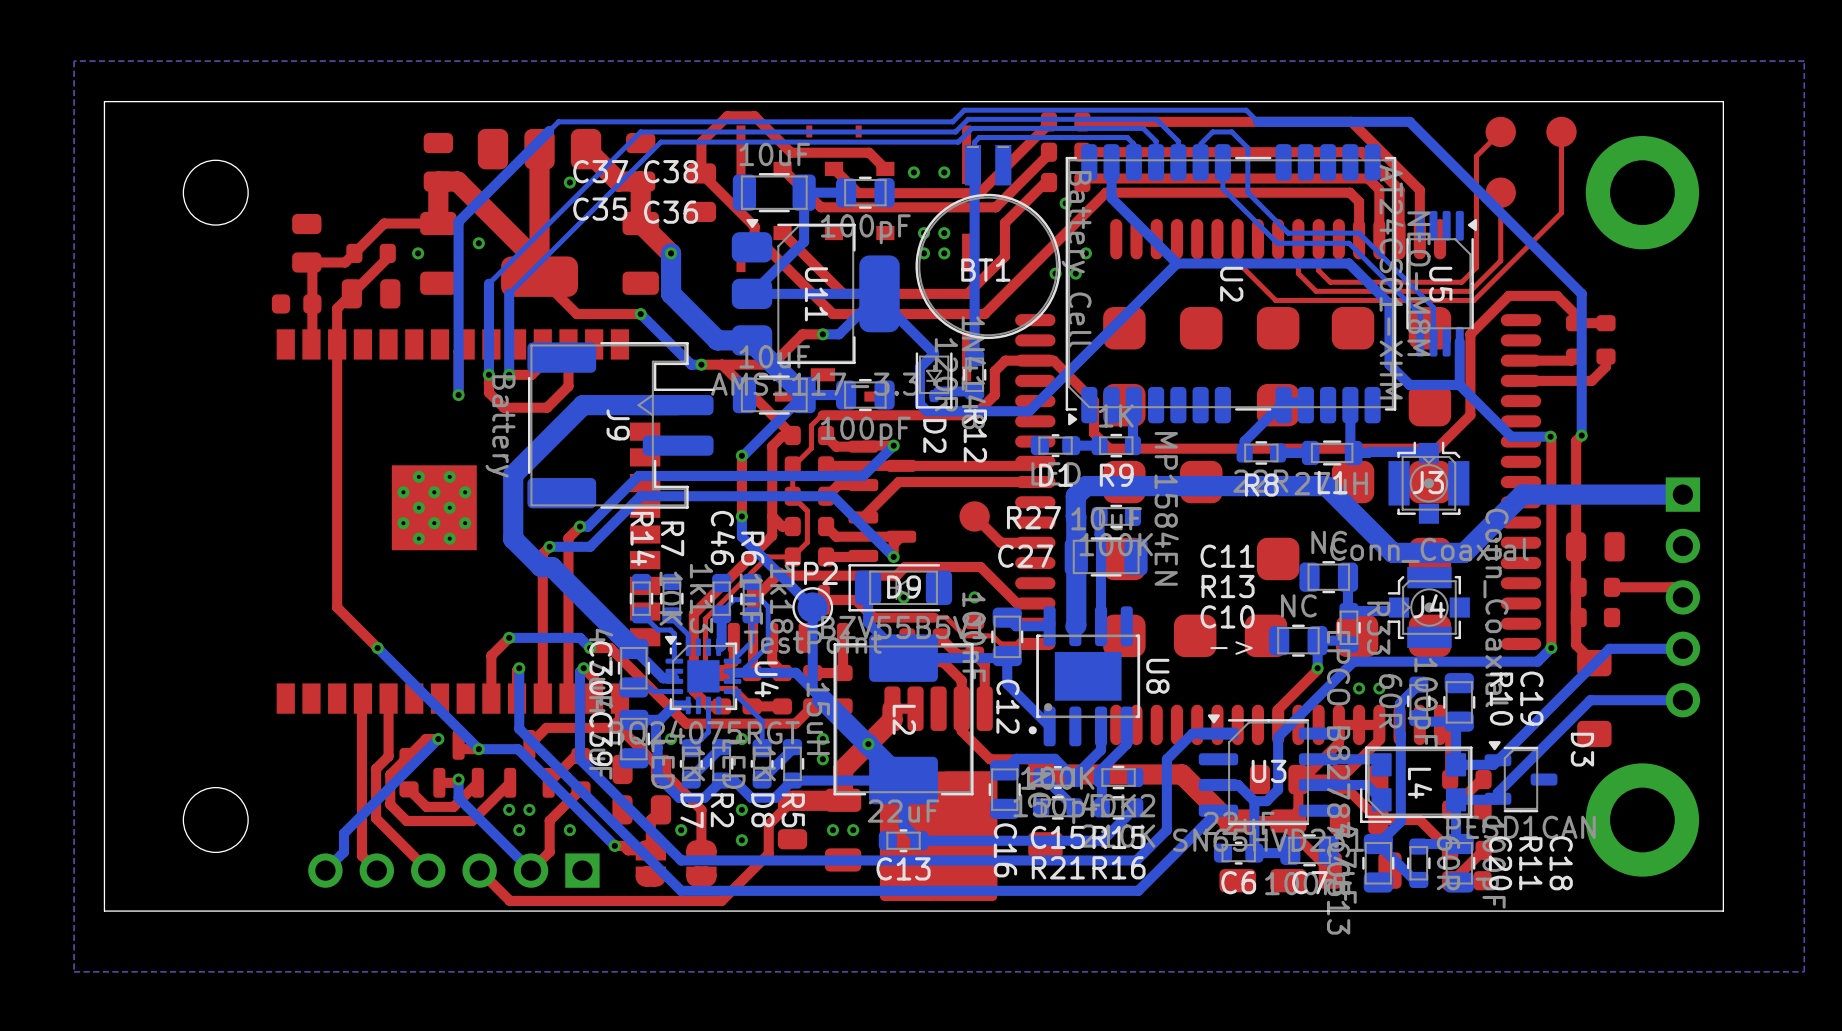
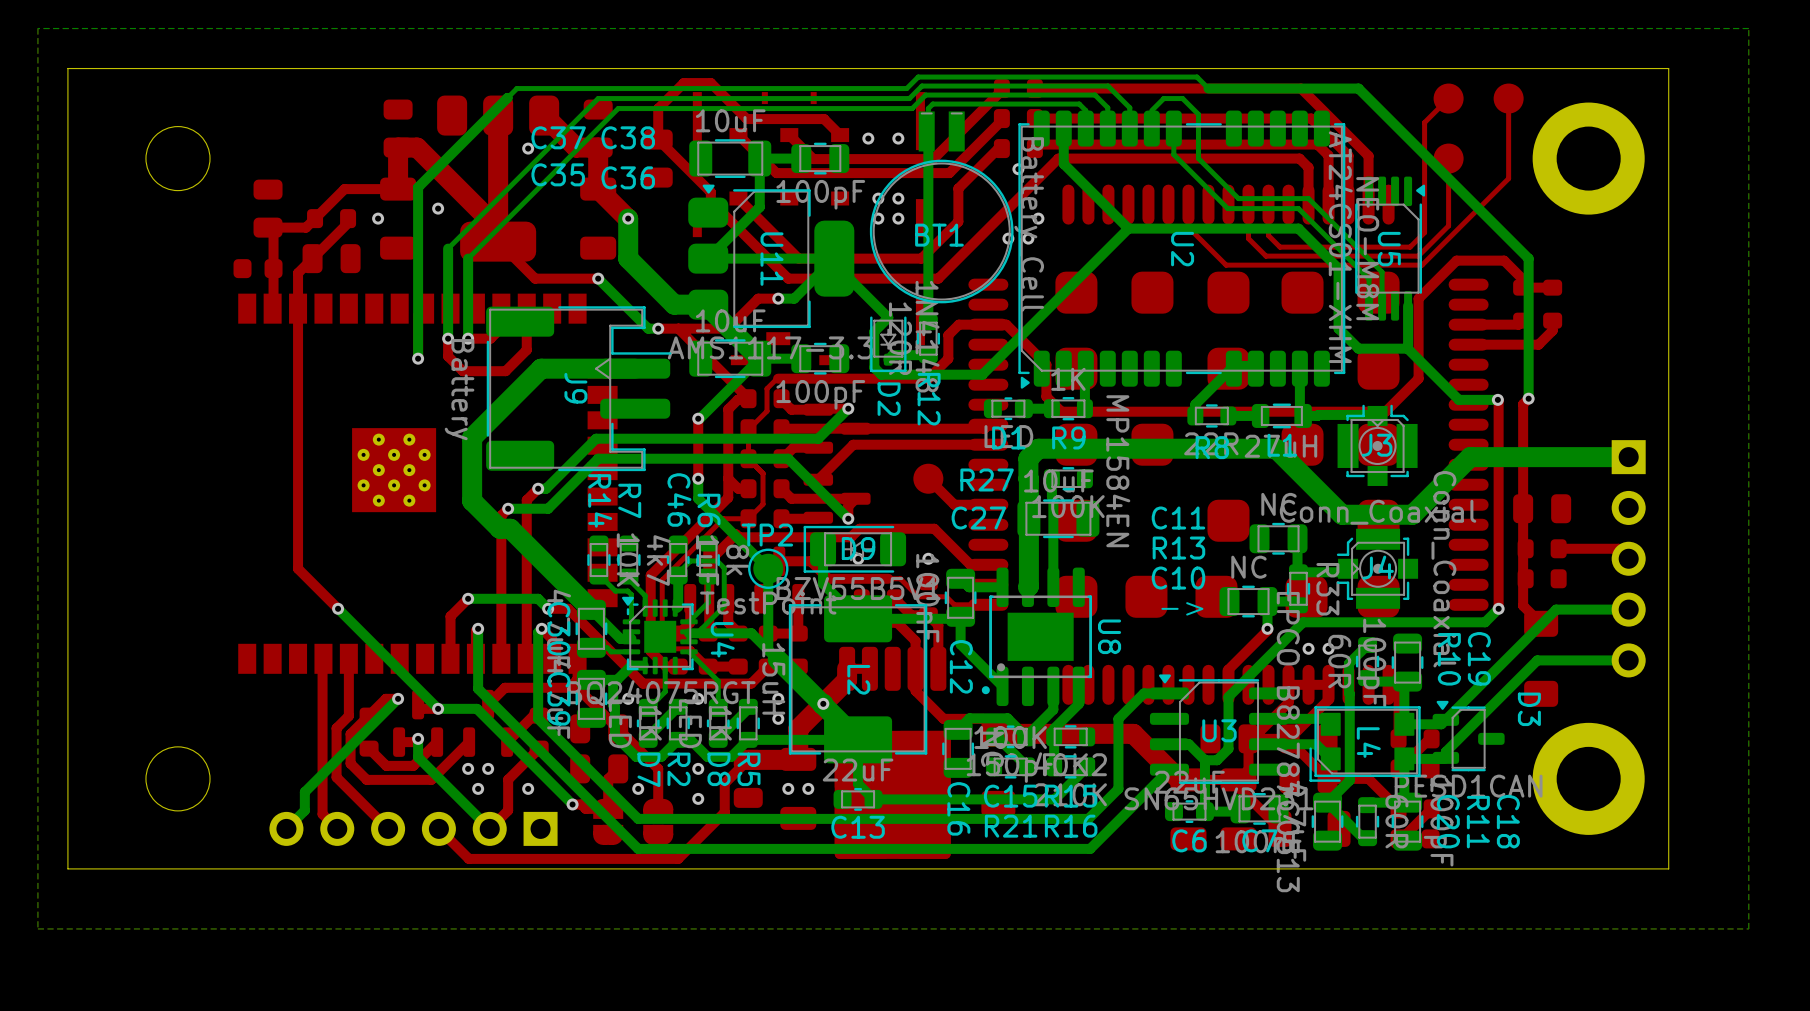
R7 value: 1k13 (701, 598) -> 4k7 (658, 560)
R6 value: 1k18 (781, 598) -> 8k (737, 560)

